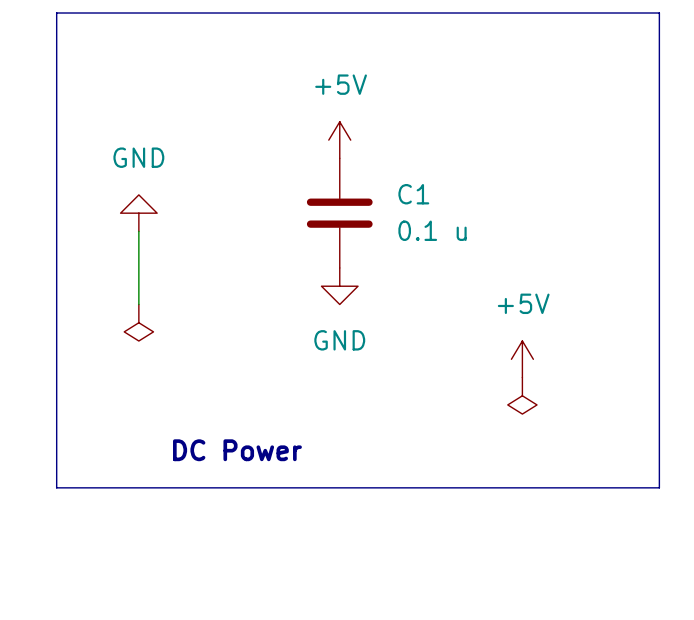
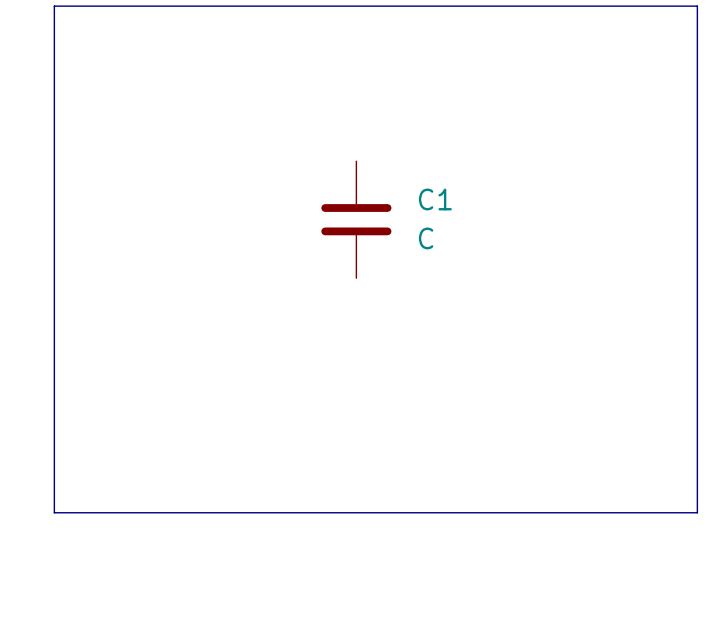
power symbol: +5V (339, 140) -> none
power symbol: GND (138, 213) -> none
C1 value: 0.1 u (432, 230) -> C (426, 238)
wire: (138, 231) (138, 304) -> none
power symbol: GND (339, 286) -> none
power symbol: (138, 322) -> none
power symbol: +5V (522, 359) -> none
power symbol: (522, 395) -> none
text: DC Power (237, 450) -> none

